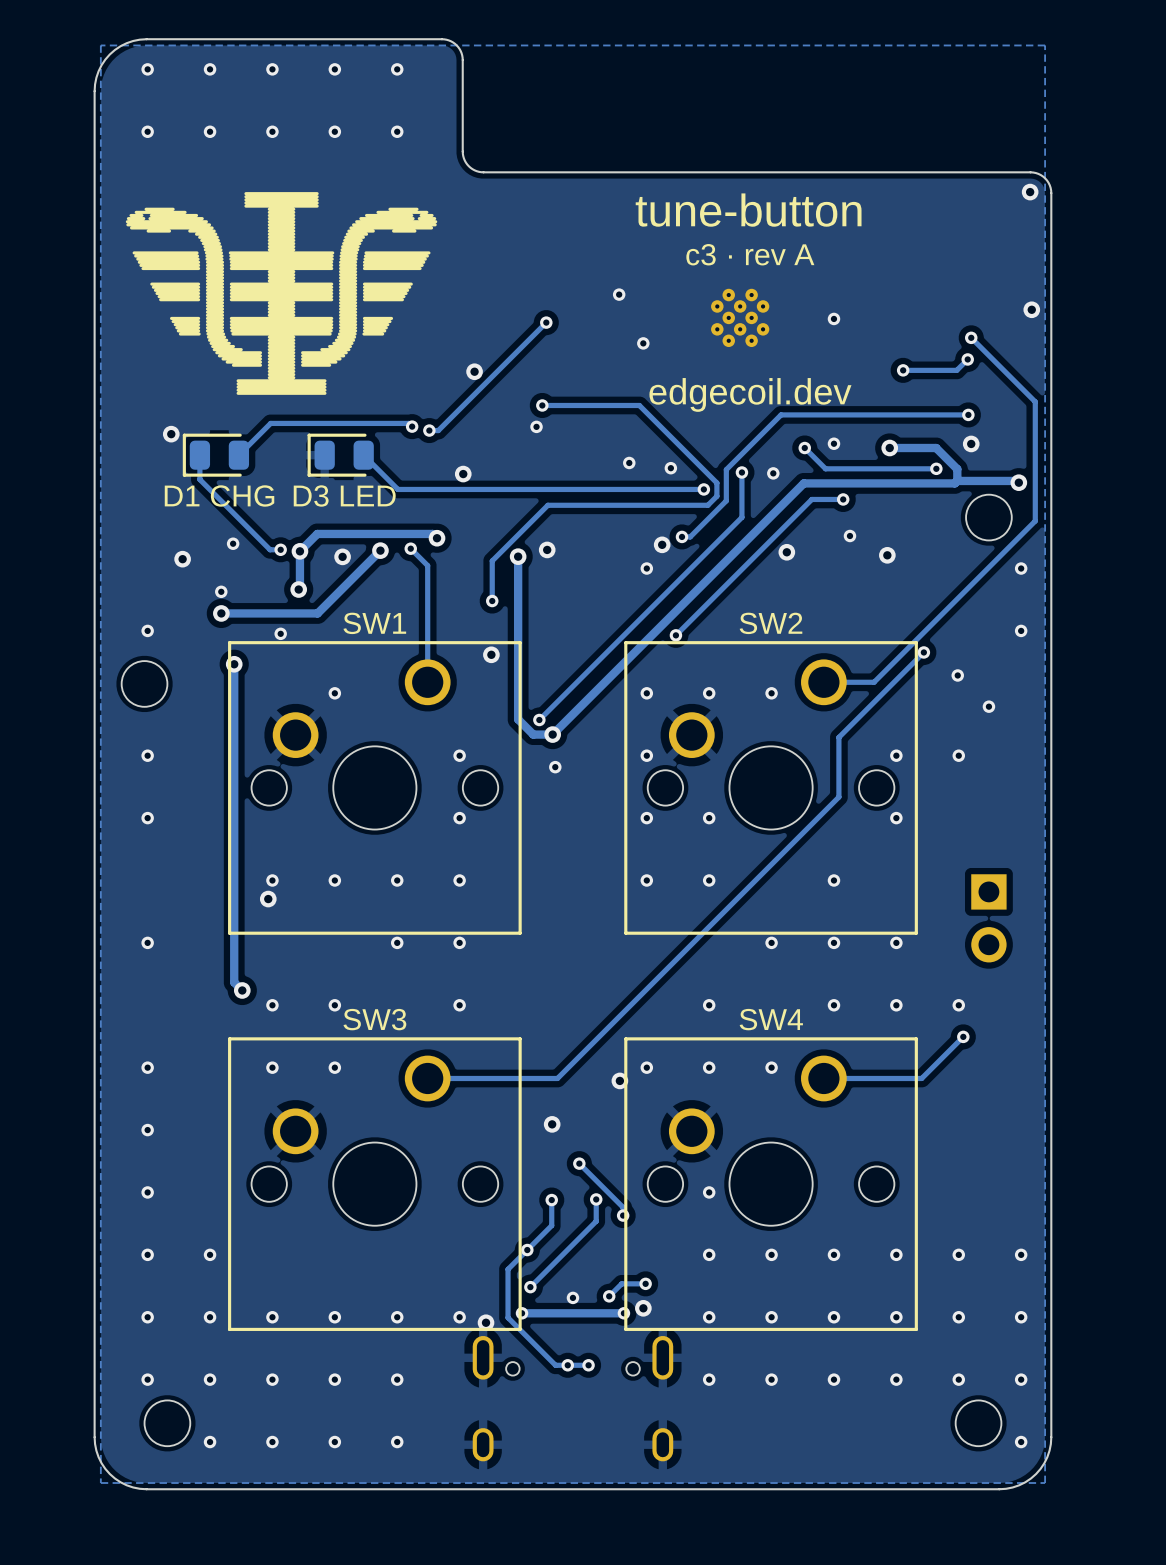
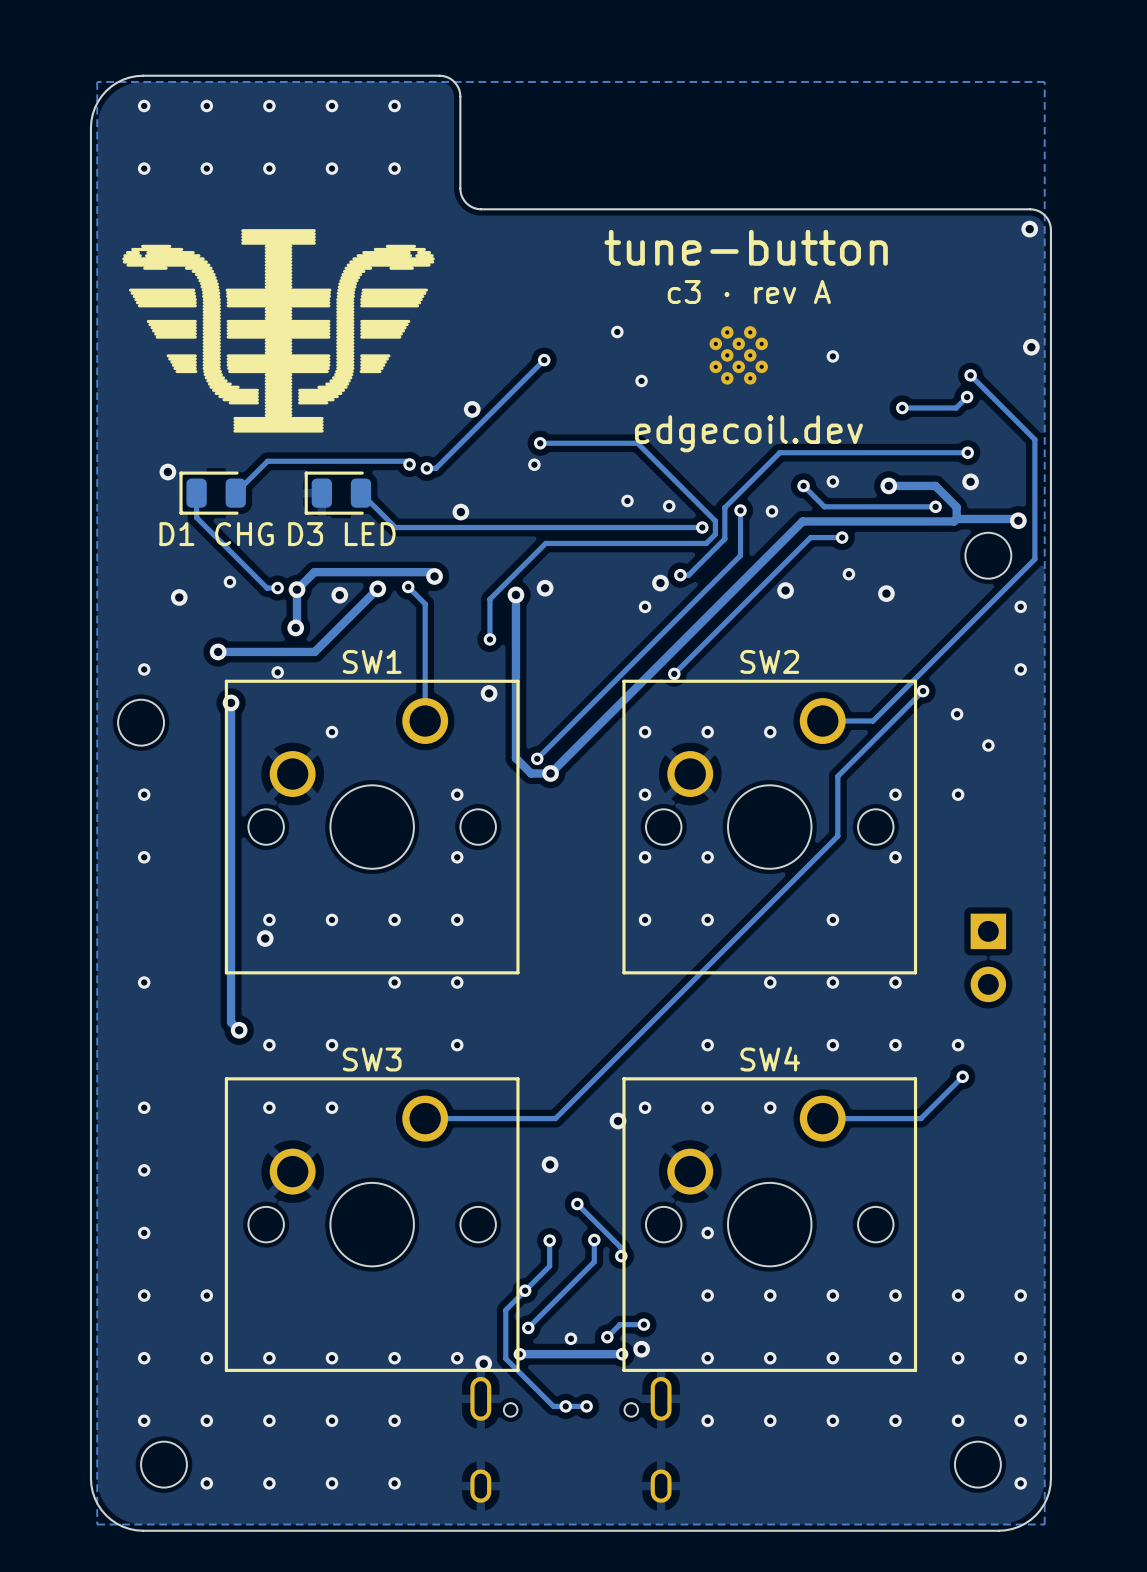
via: (221, 591) -> none
via: (555, 767) -> none

